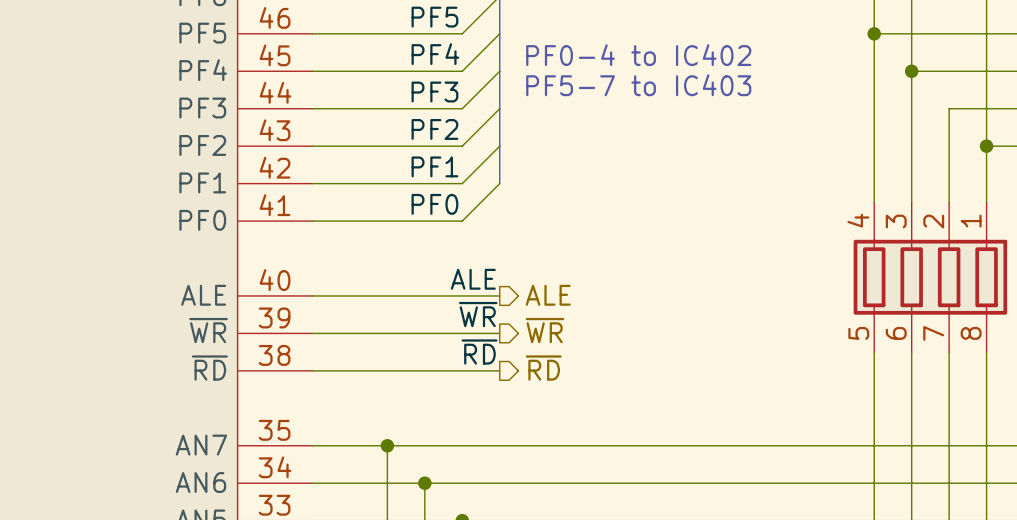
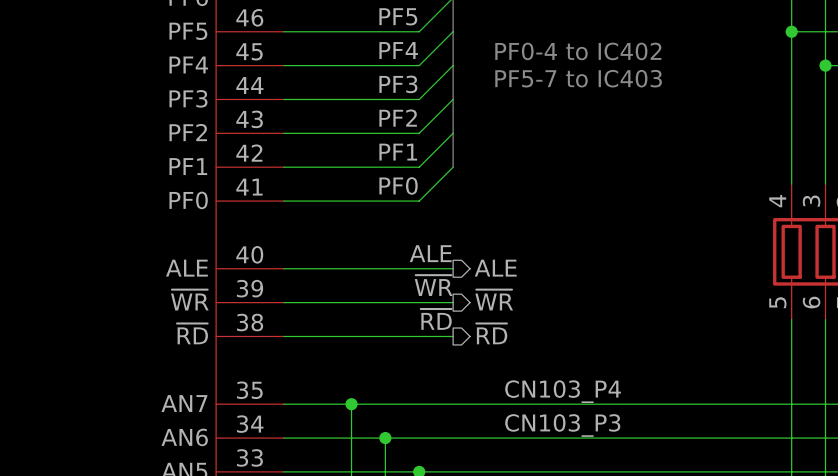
label: none -> CN103_P4 (563, 391)
label: none -> CN103_P3 (562, 425)

